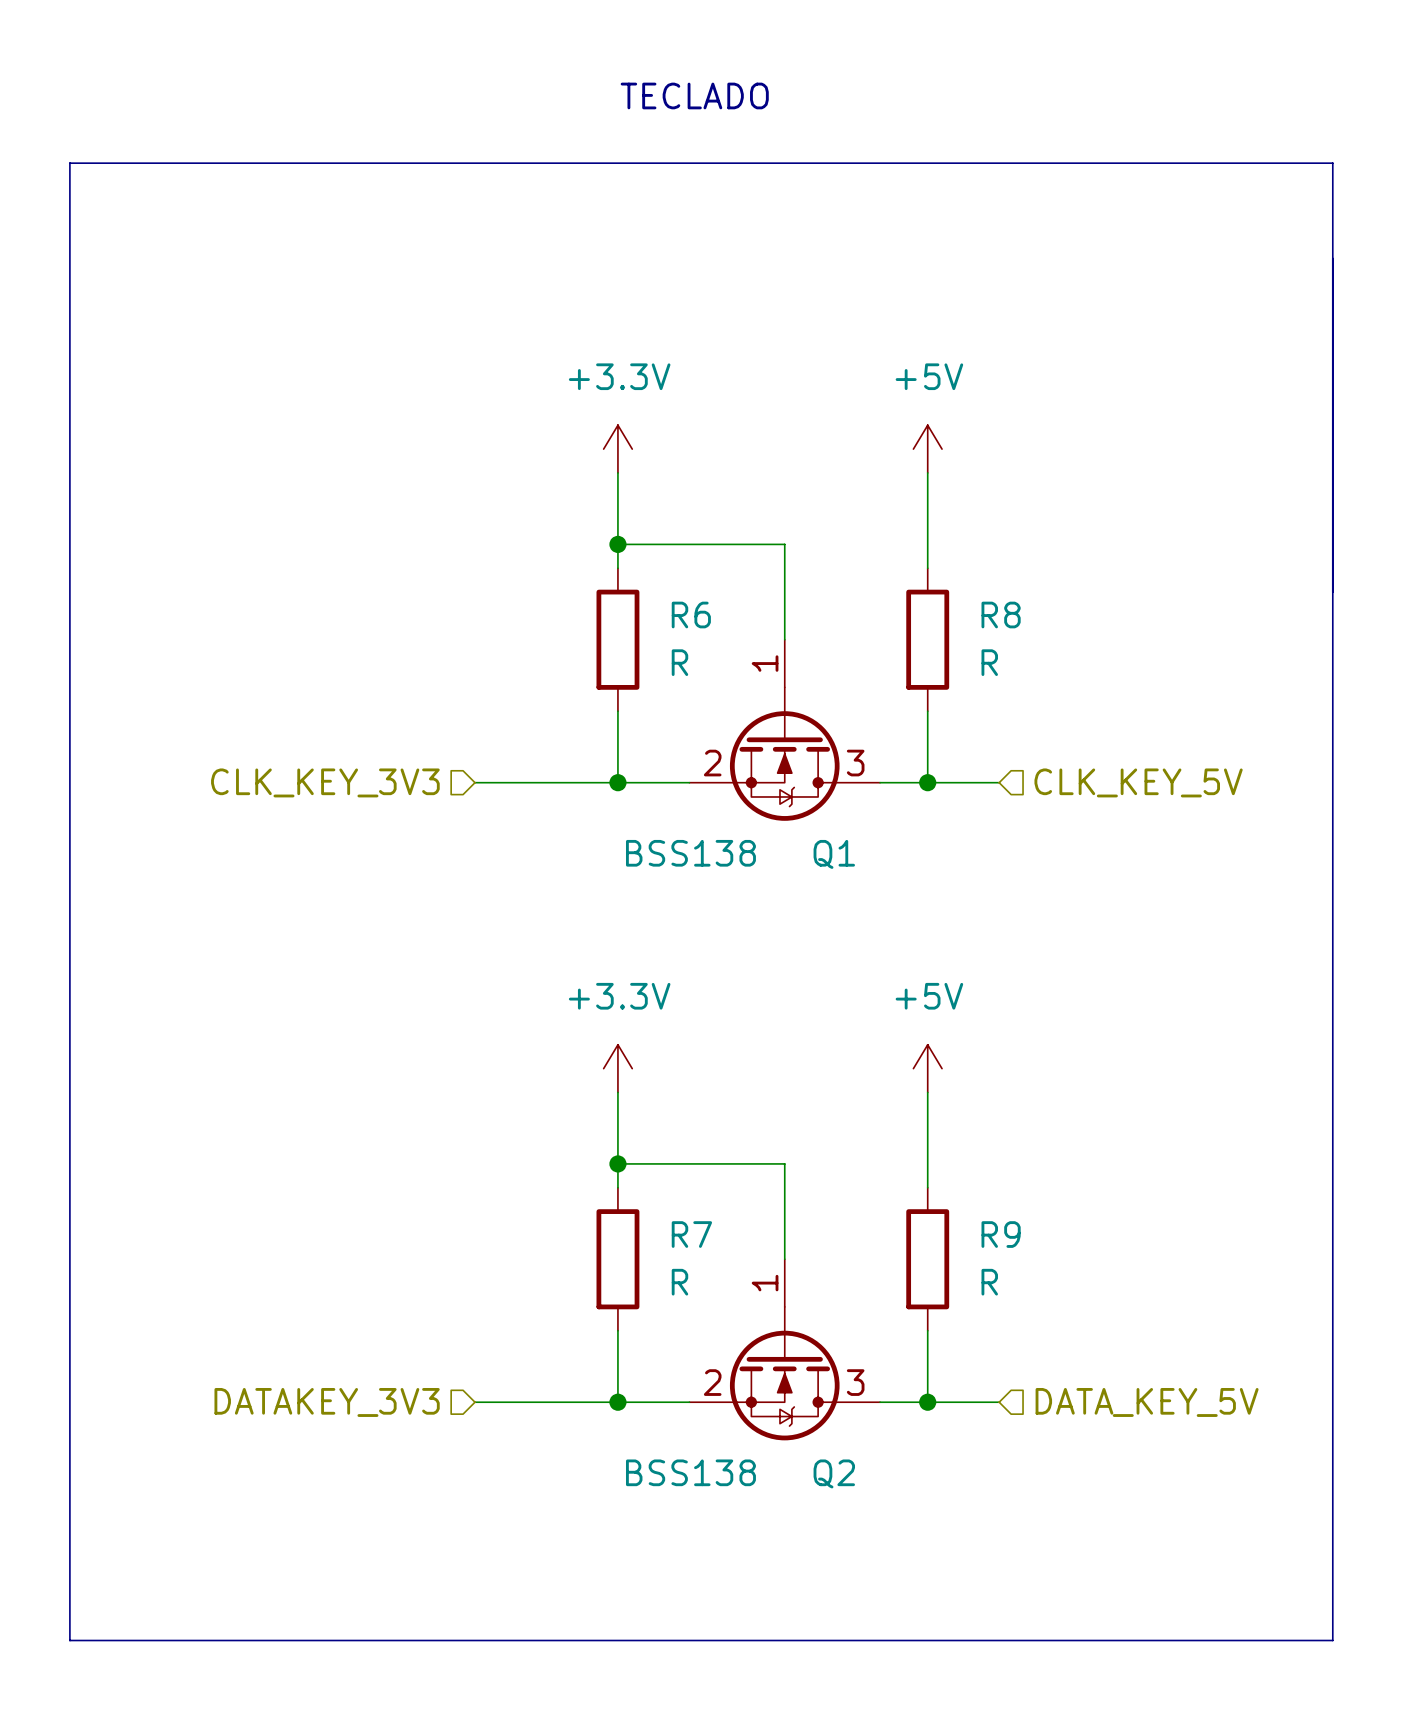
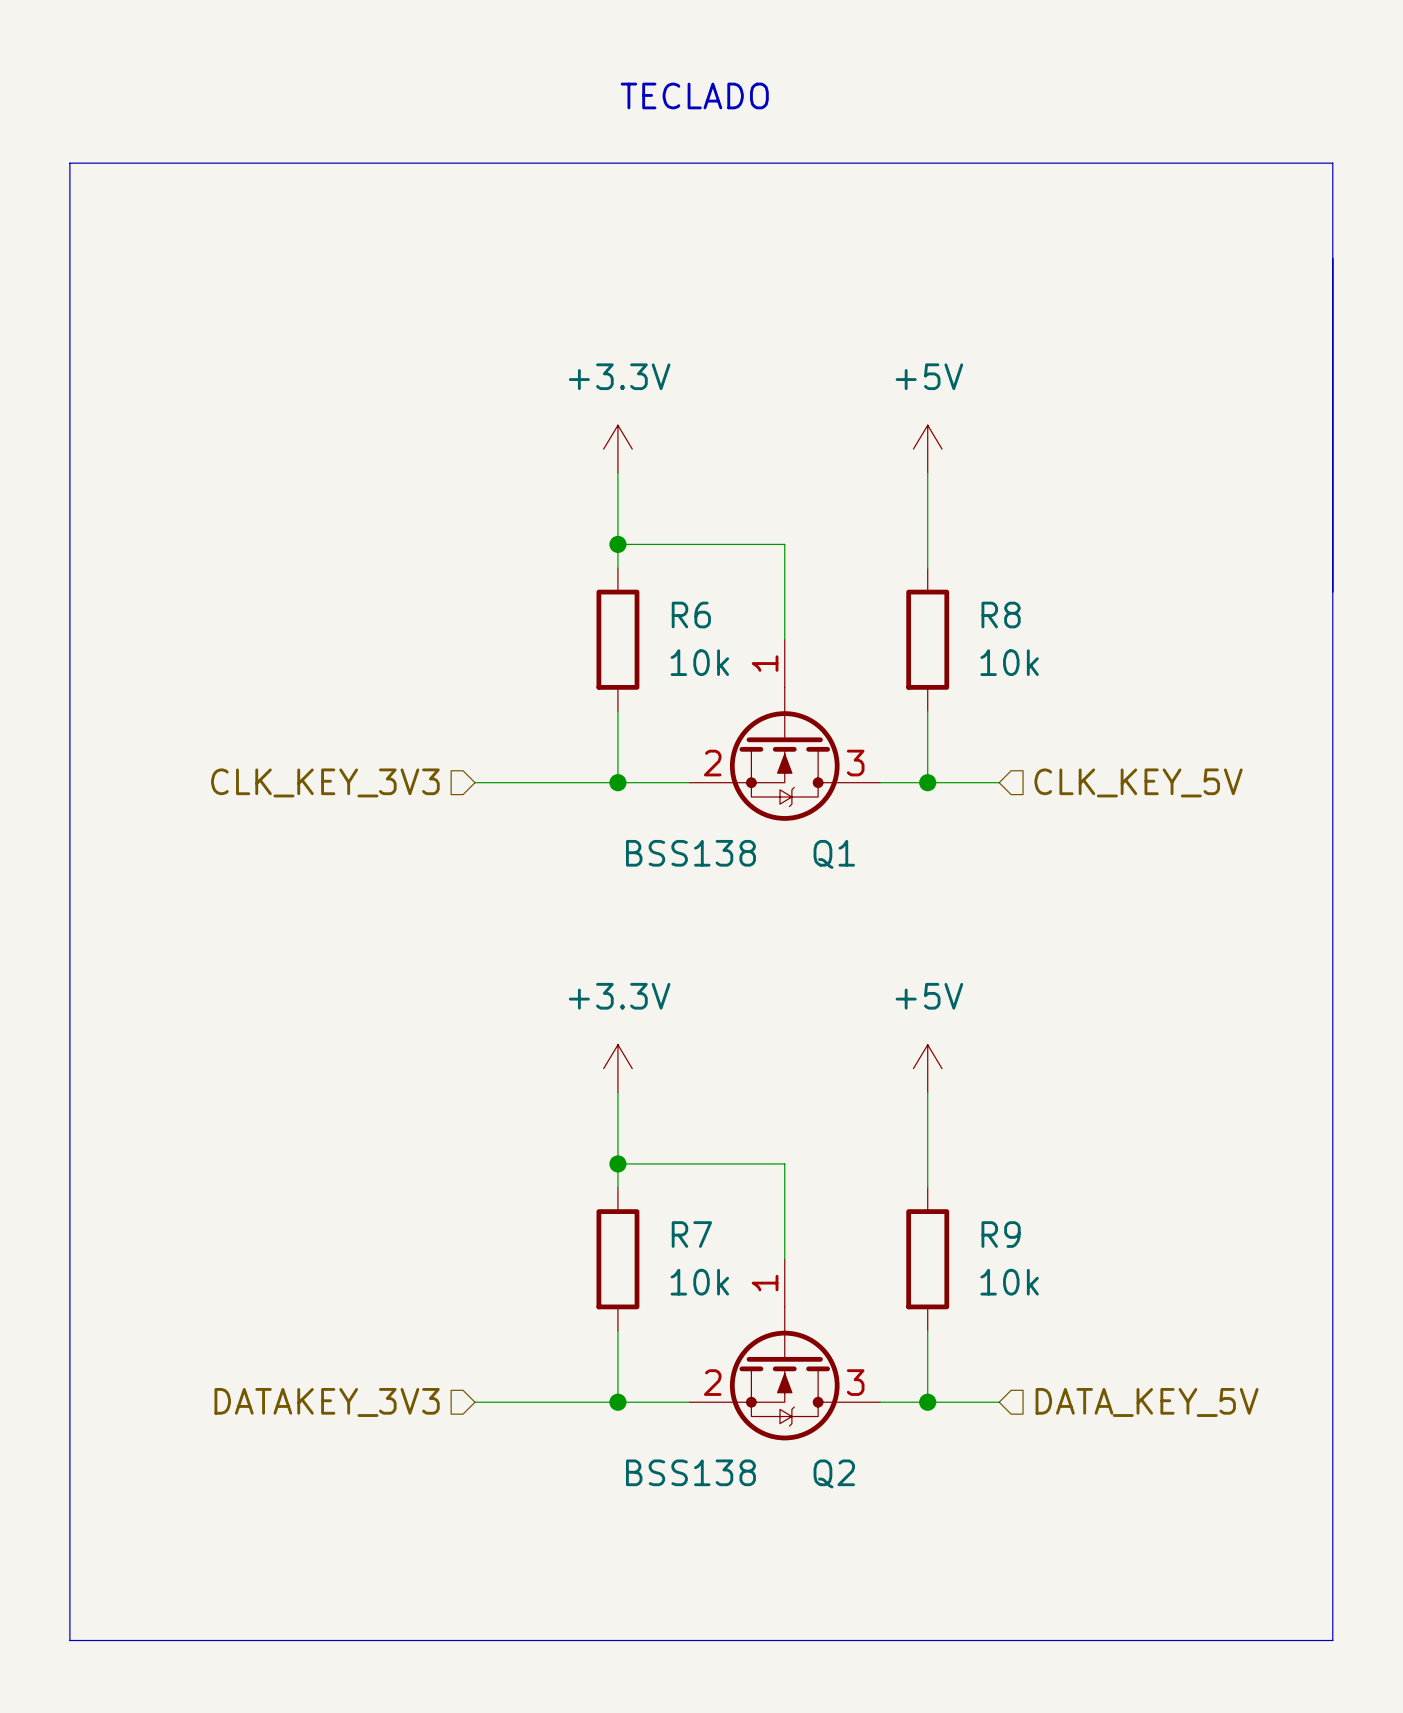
R6 value: R (679, 662) -> 10k (699, 662)
R8 value: R (989, 662) -> 10k (1009, 662)
R7 value: R (679, 1282) -> 10k (699, 1282)
R9 value: R (989, 1282) -> 10k (1009, 1282)

